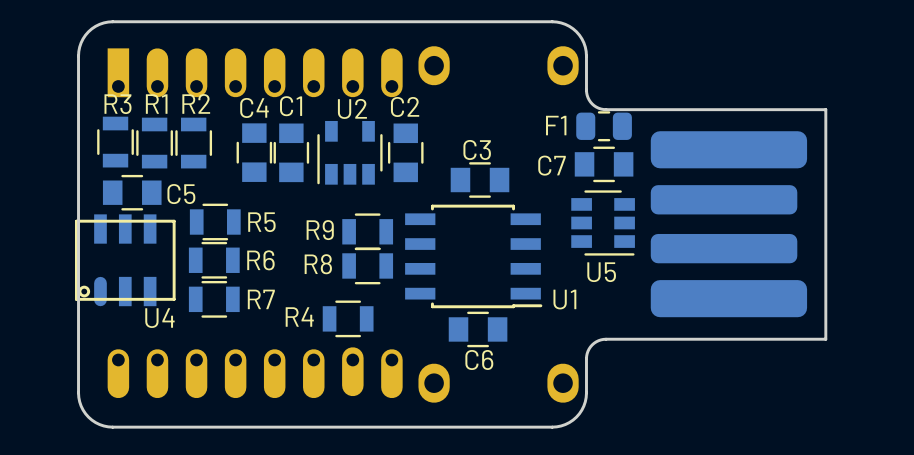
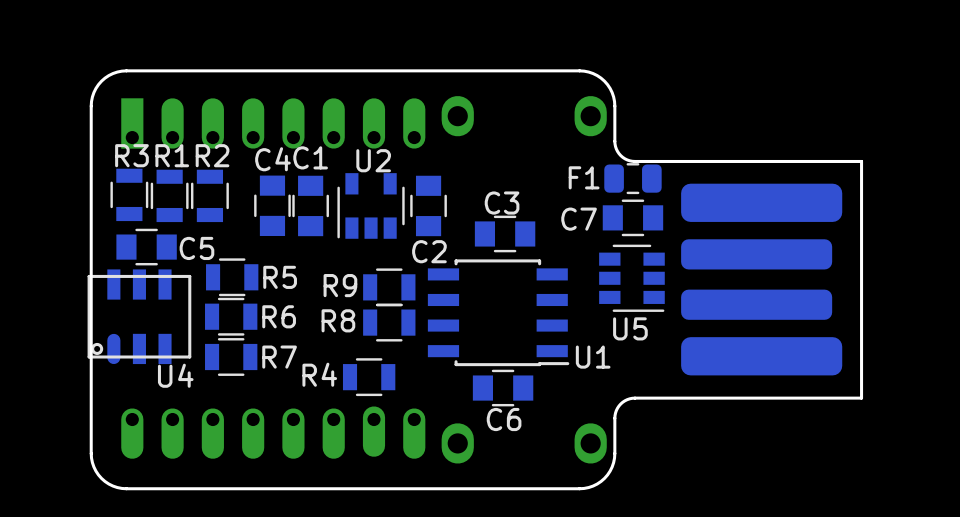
C2 name position: C2 (405, 107) -> C2 (429, 251)

